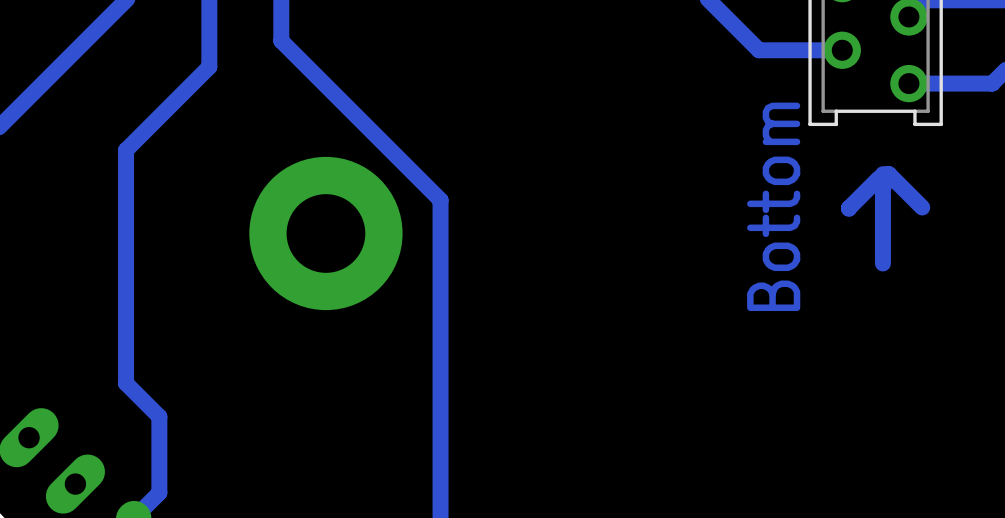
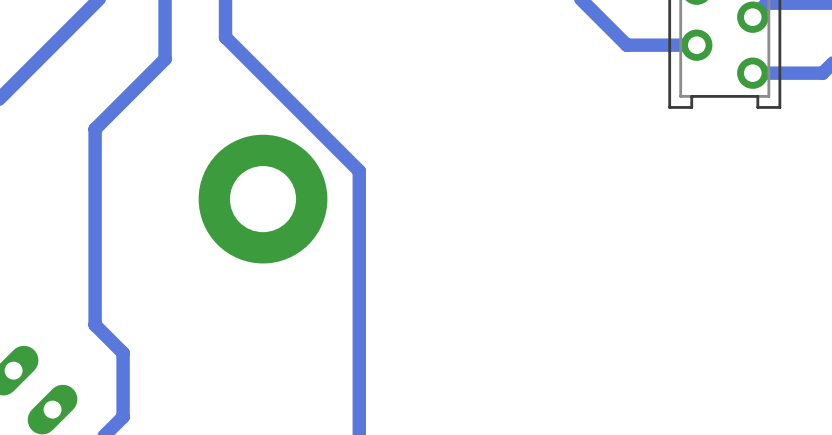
track: (882, 174) (888, 174) (922, 207) -> none
track: (878, 178) (848, 208) -> none
track: (884, 185) (882, 263) -> none
text: Bottom (773, 206) -> none

